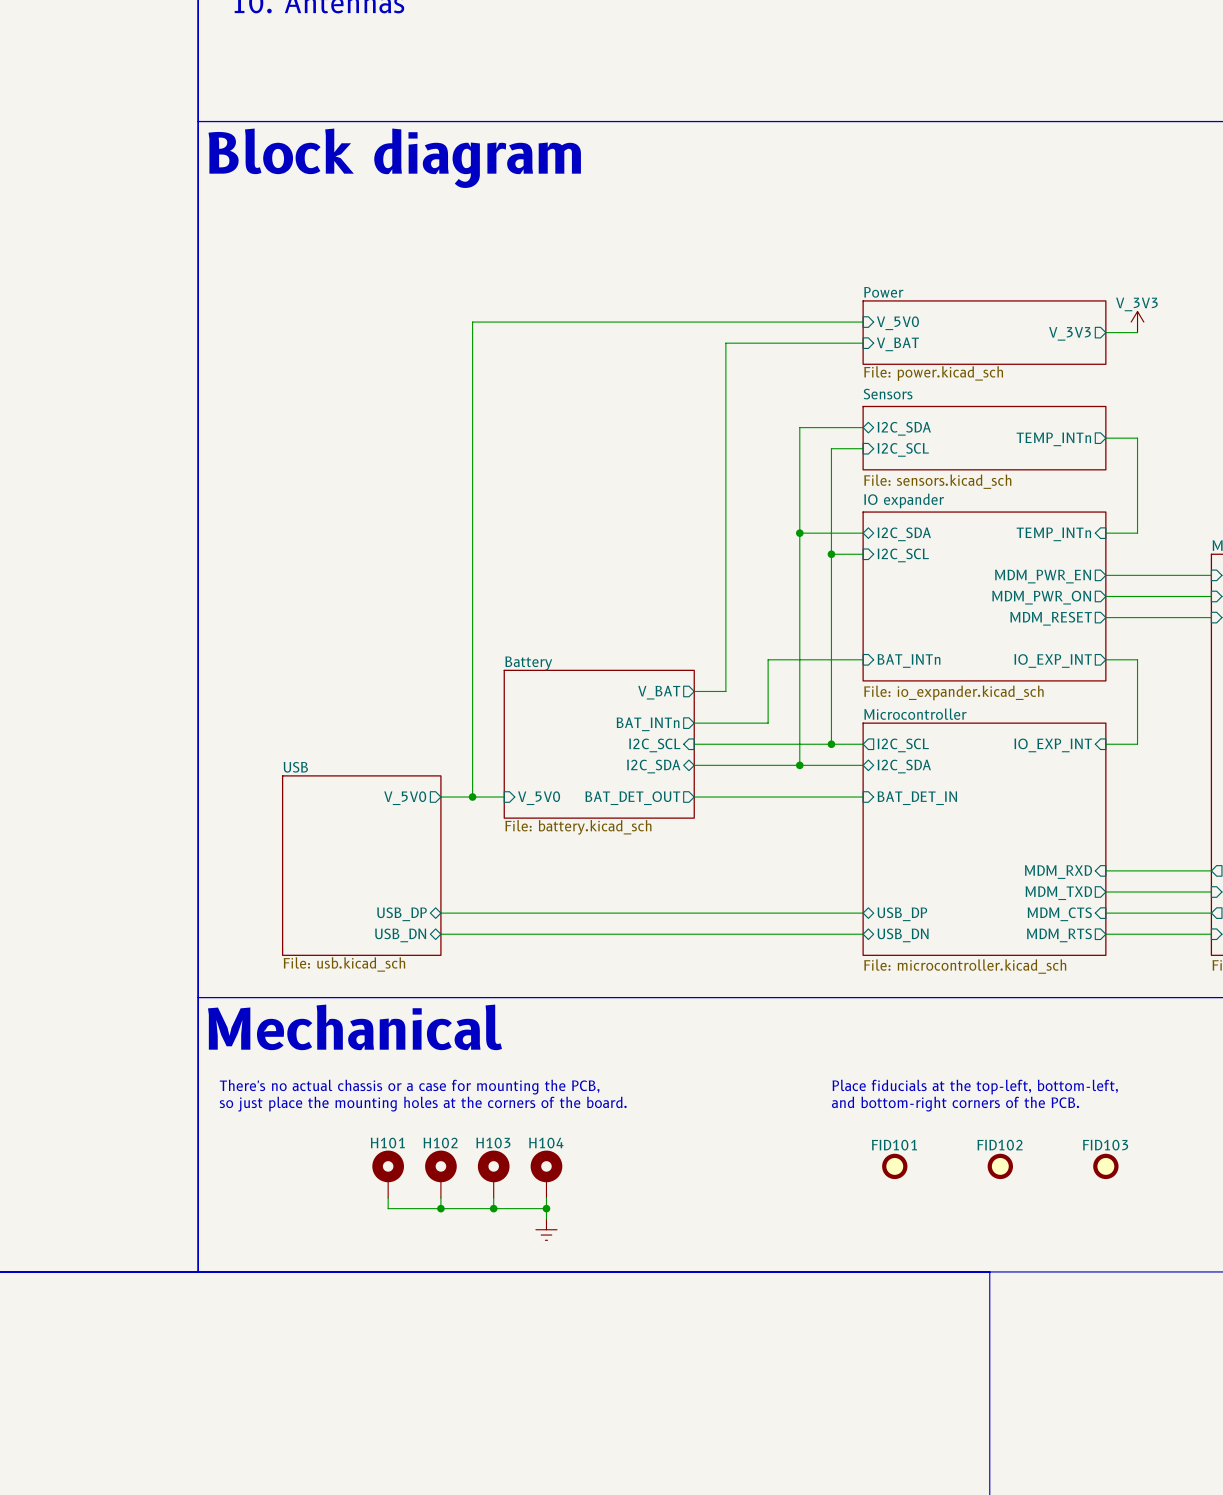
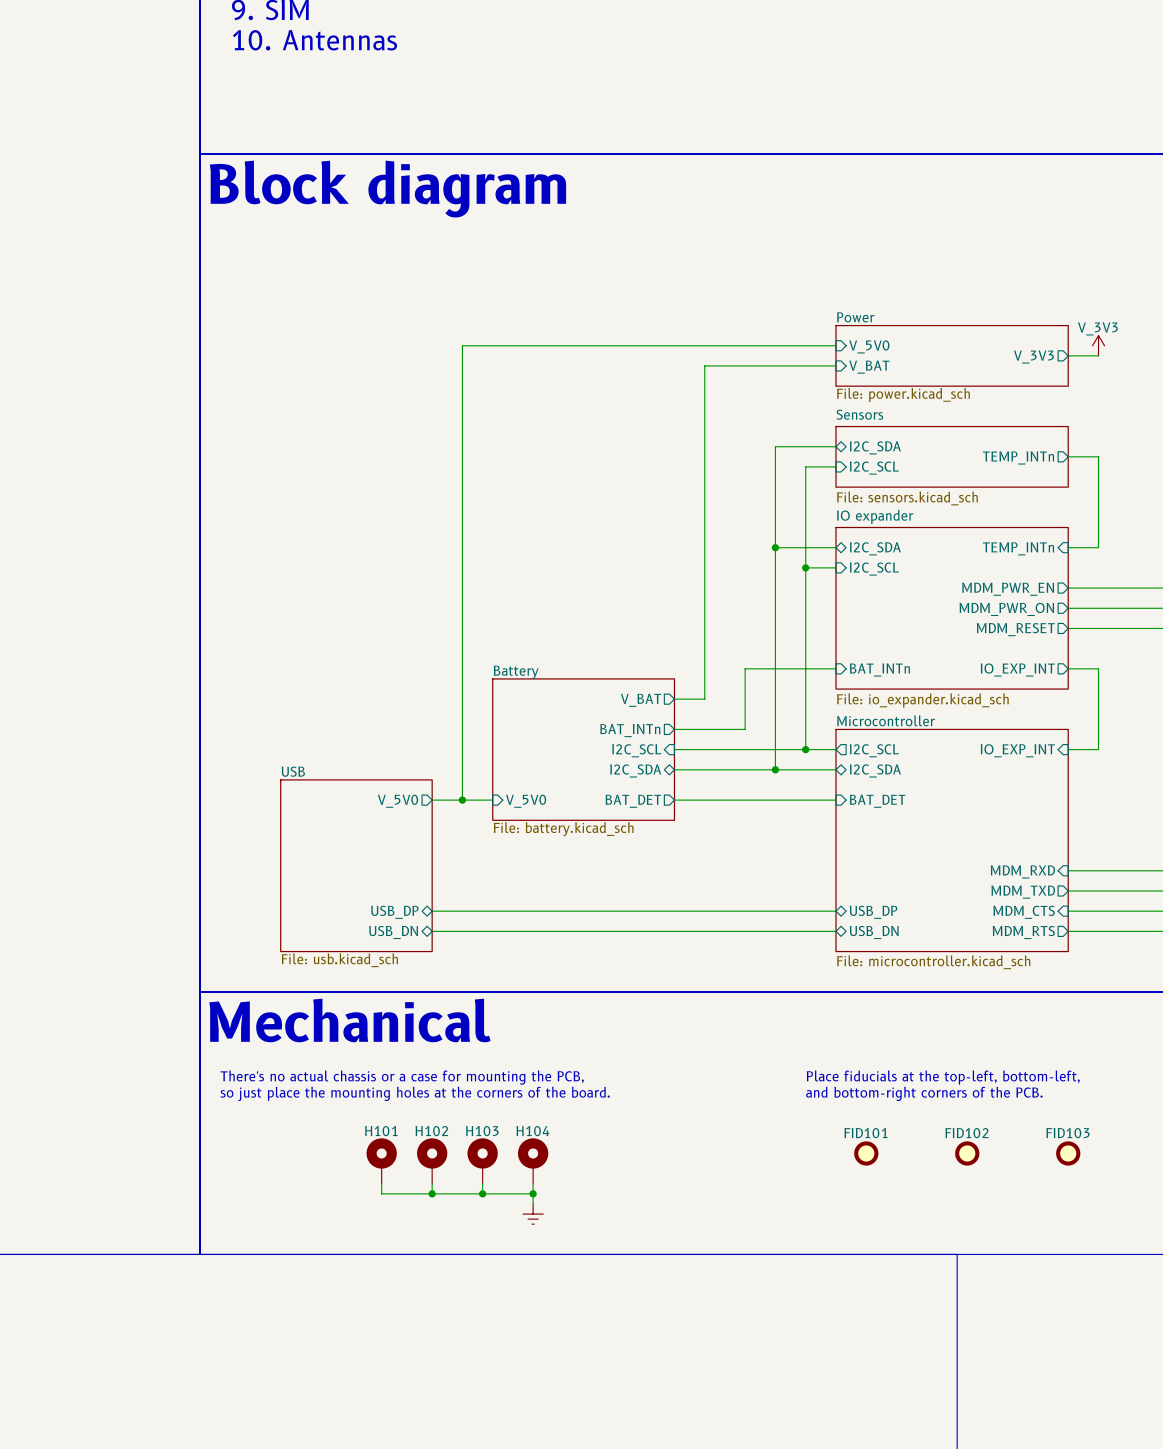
sheet pin: BAT_DET_OUT (632, 798) -> BAT_DET (633, 801)
sheet pin: BAT_DET_IN (917, 798) -> BAT_DET (877, 801)

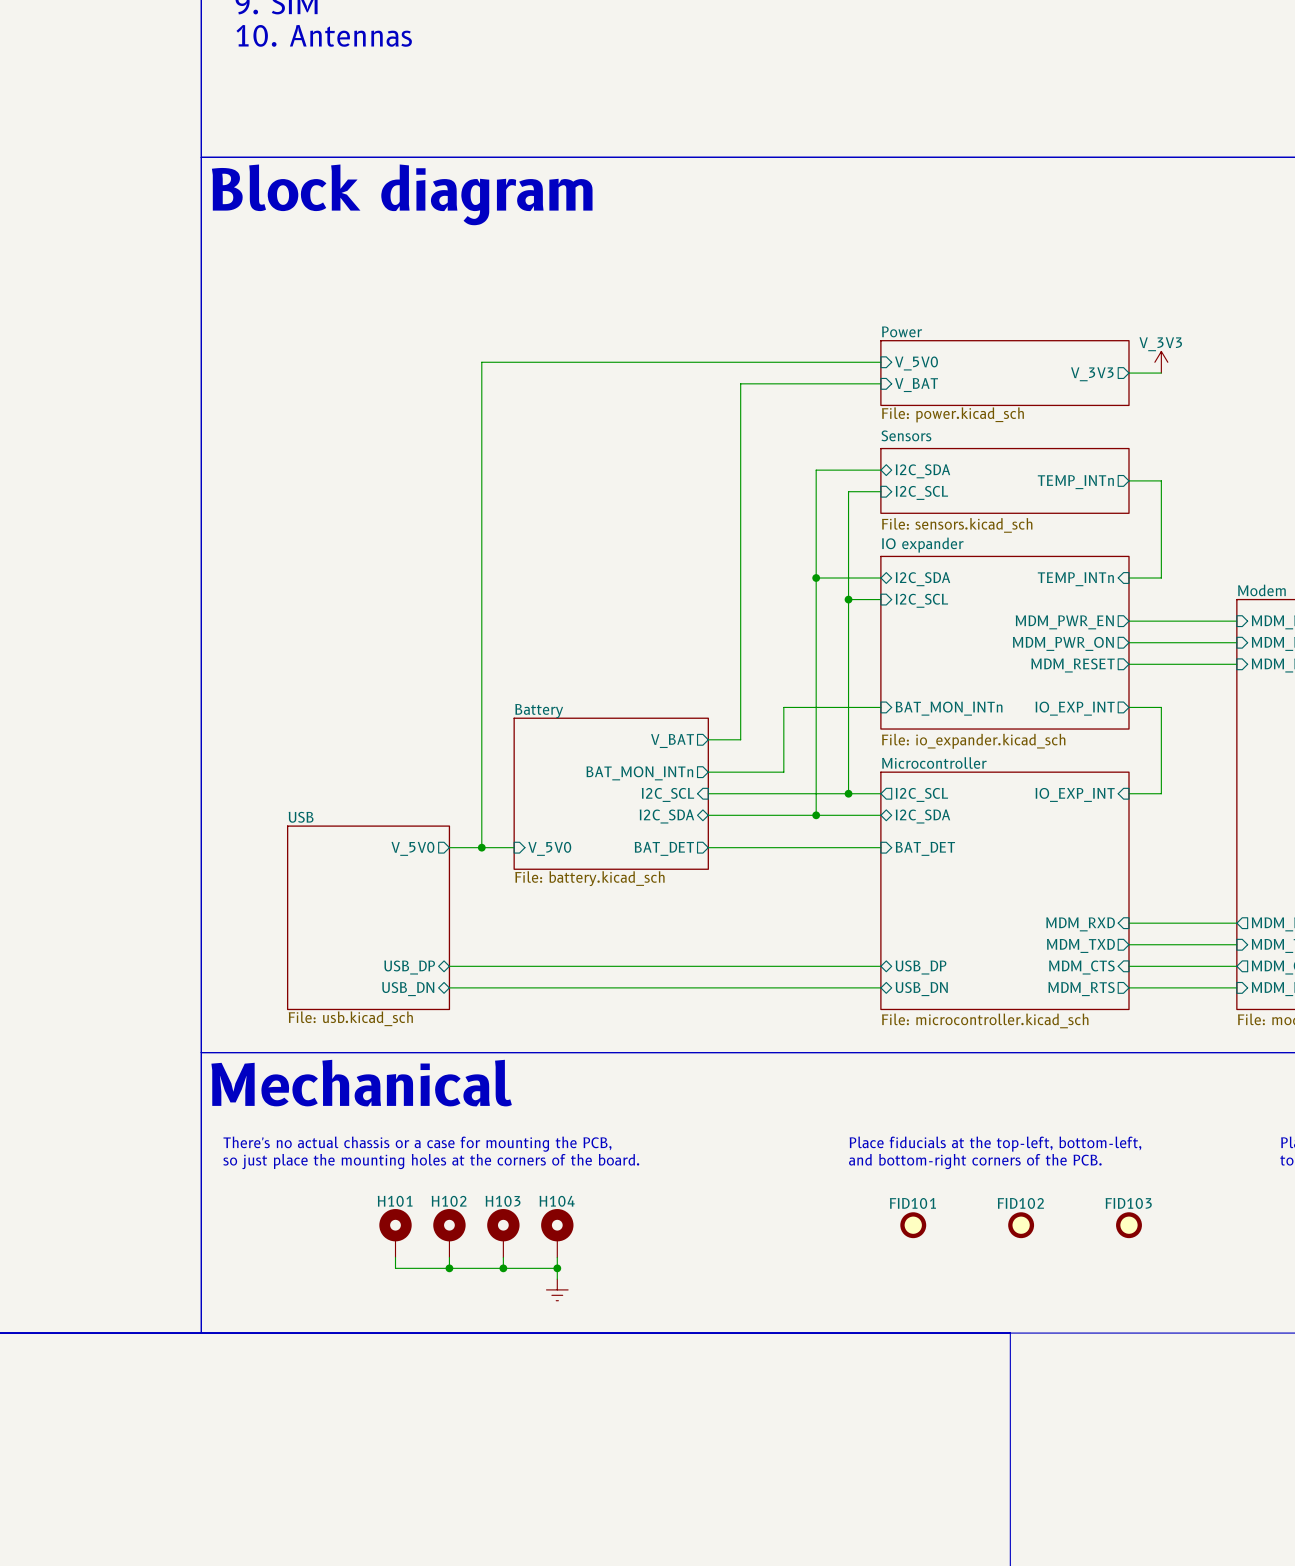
sheet pin: BAT_INTn (879, 669) -> BAT_MON_INTn (949, 708)
sheet pin: BAT_INTn (630, 730) -> BAT_MON_INTn (639, 773)

